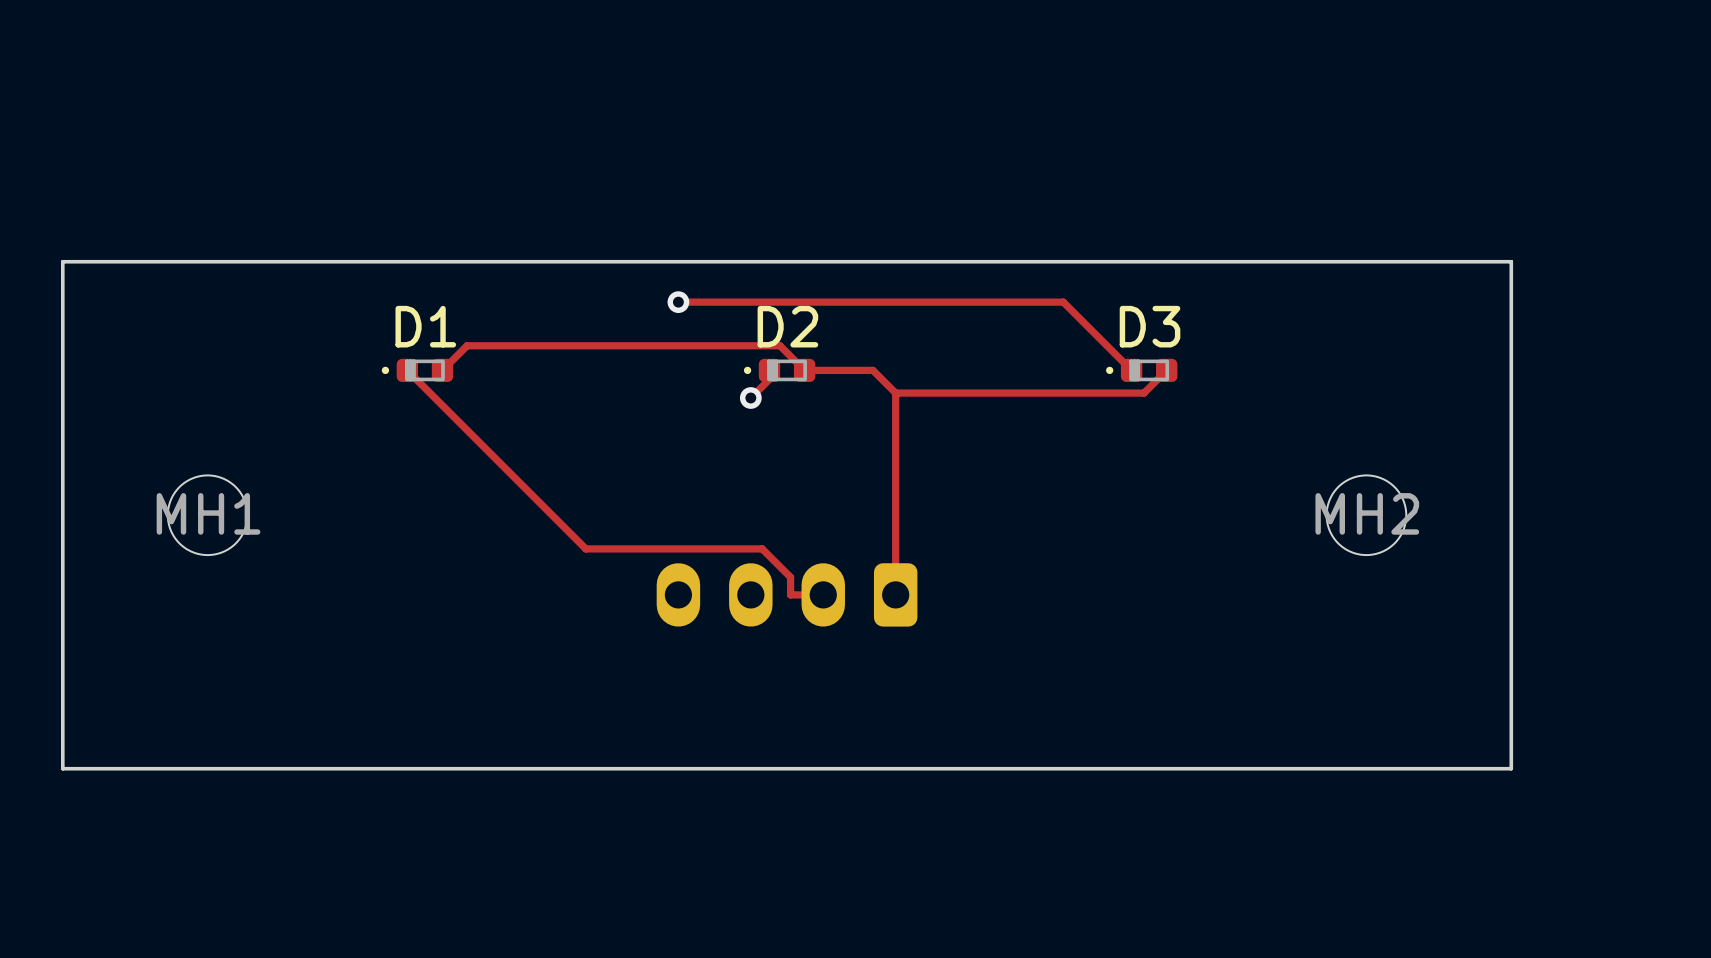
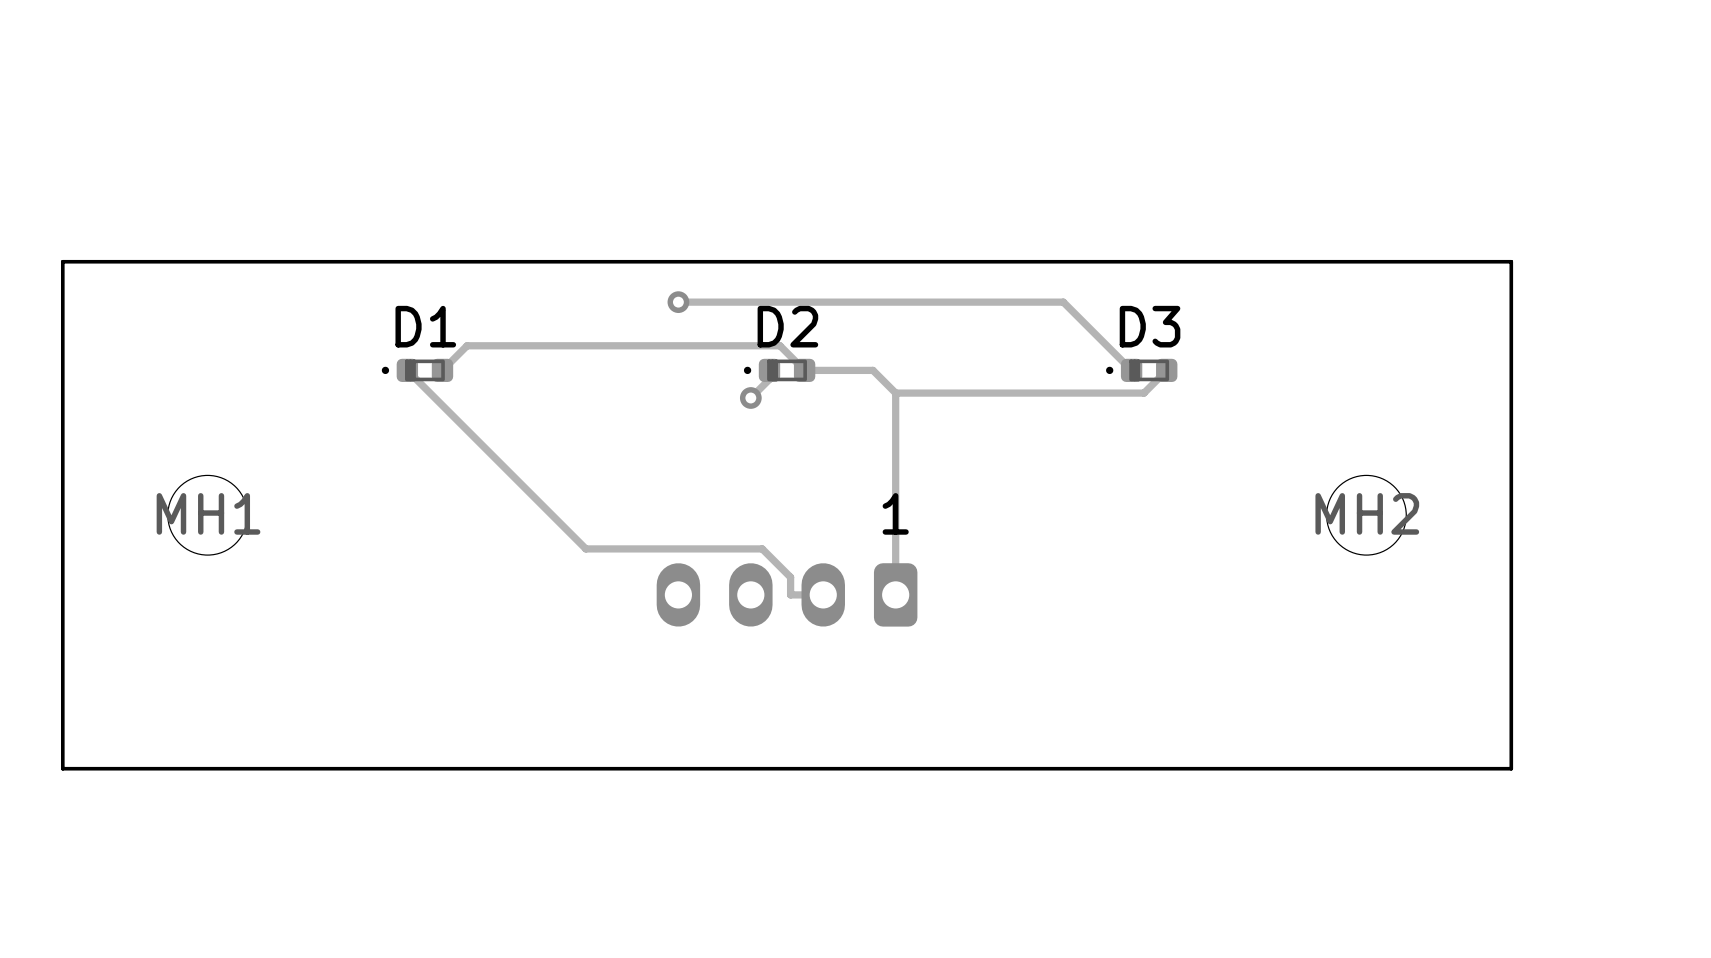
text: none -> 1 (895, 513)

